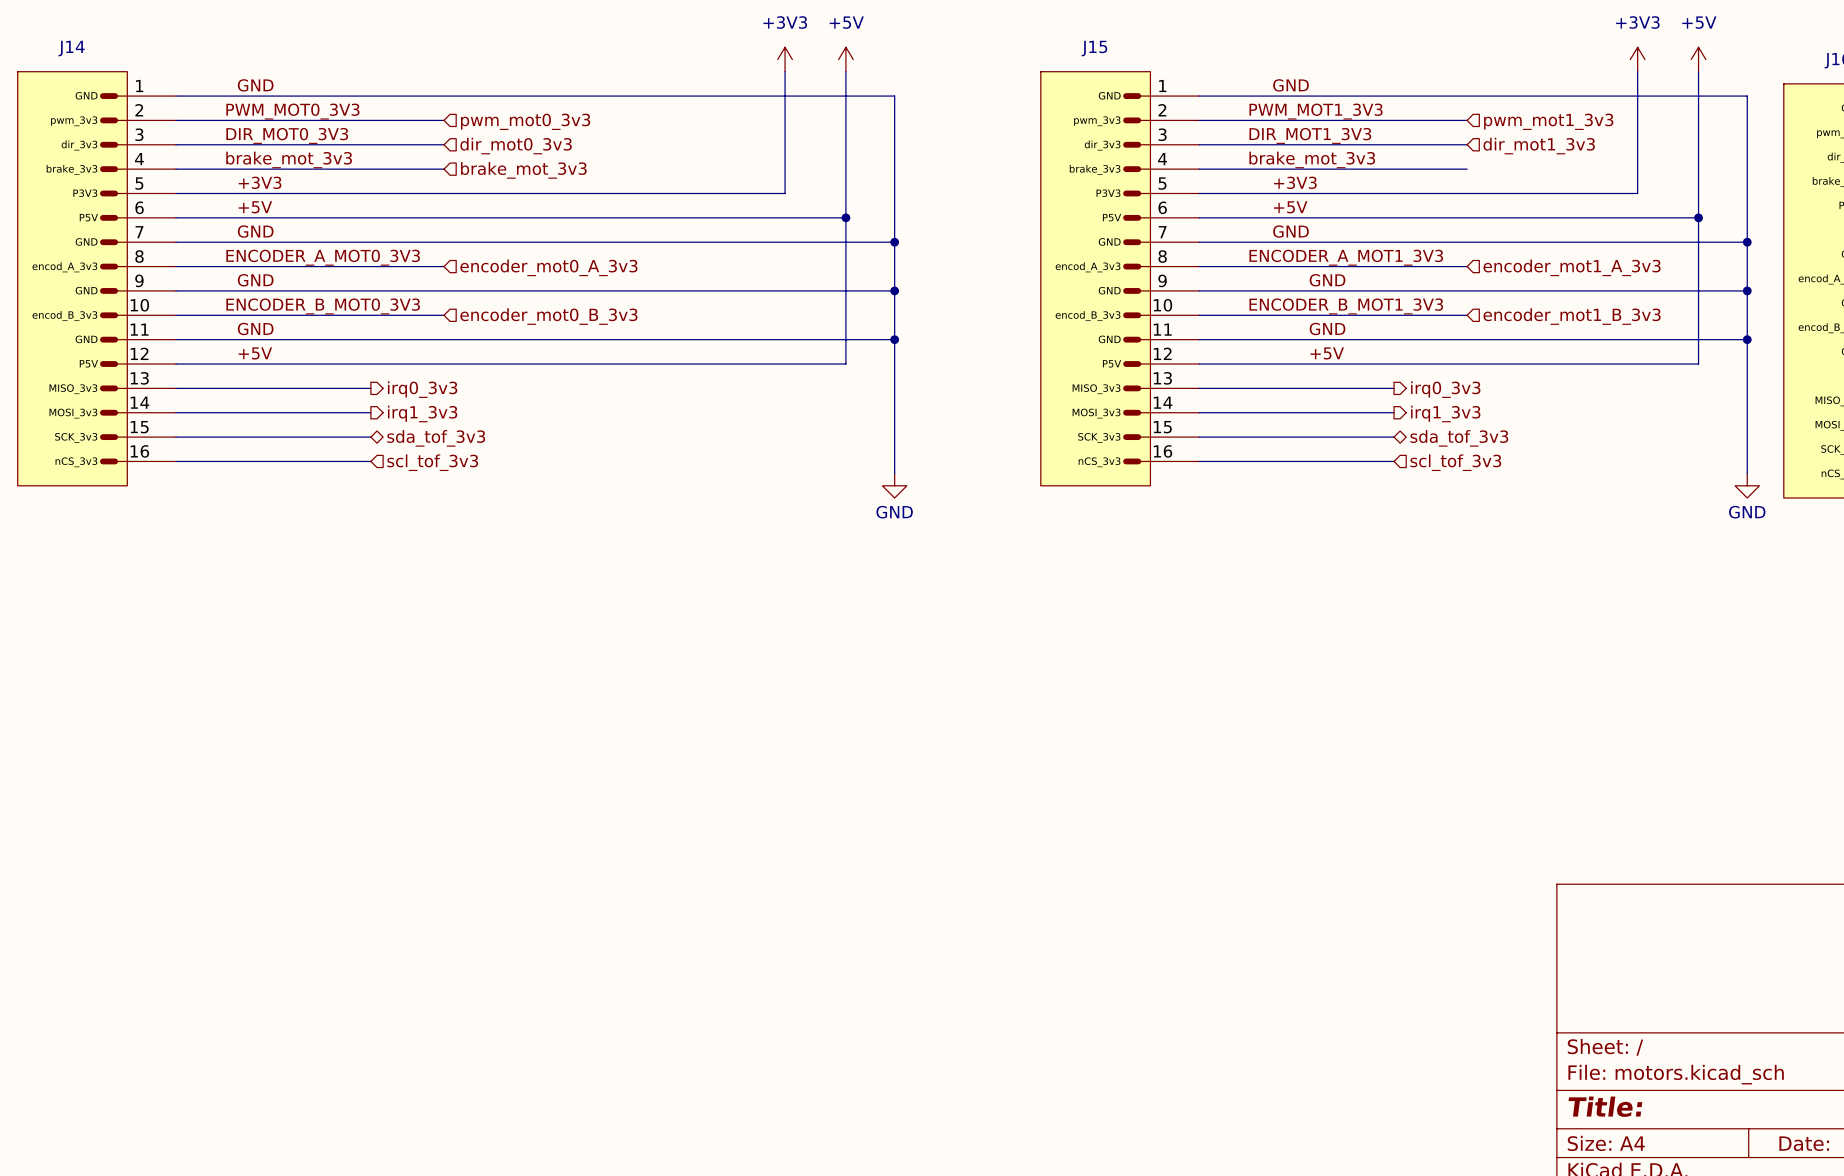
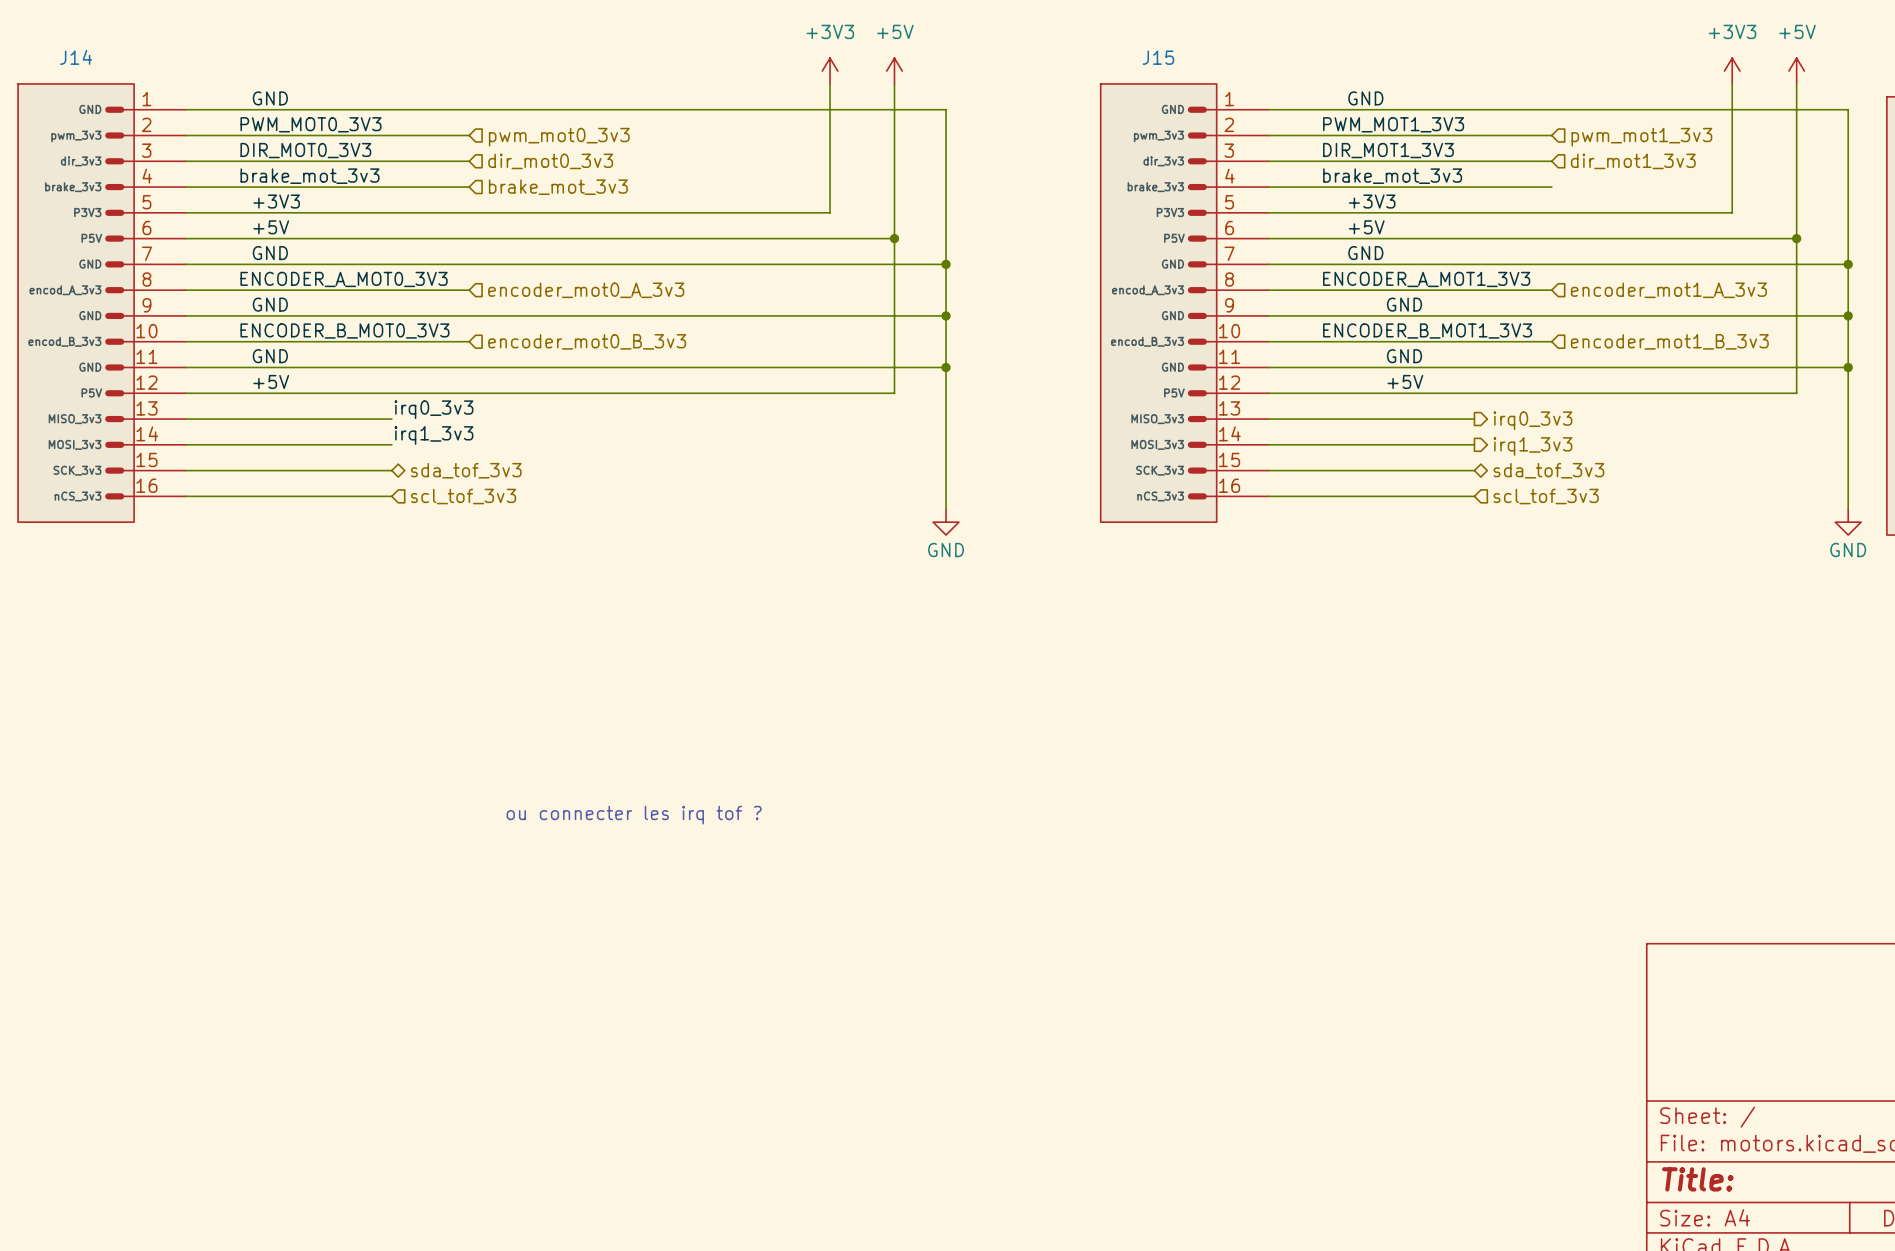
label: none -> irq0_3v3 (433, 409)
hierarchical label: irq0_3v3 (422, 389) -> none
label: none -> irq1_3v3 (433, 435)
hierarchical label: irq1_3v3 (422, 413) -> none
text: none -> ou connecter les irq tof ? (634, 815)

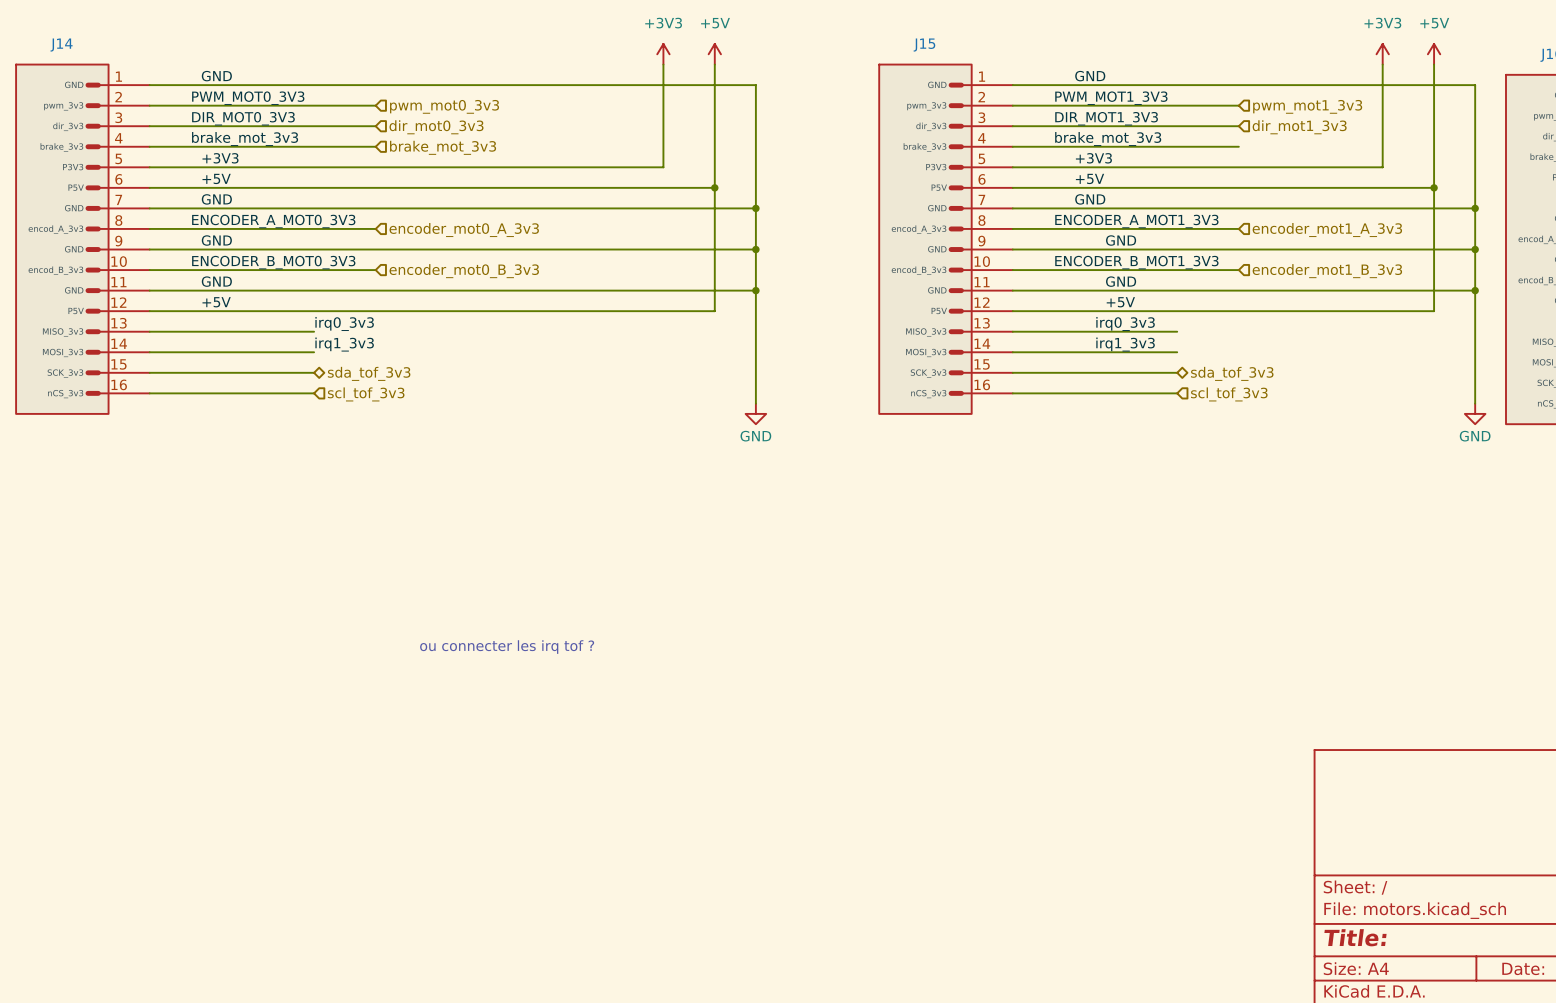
label: none -> irq0_3v3 (1125, 323)
hierarchical label: irq0_3v3 (1532, 420) -> none
label: none -> irq1_3v3 (1125, 344)
hierarchical label: irq1_3v3 (1532, 446) -> none

